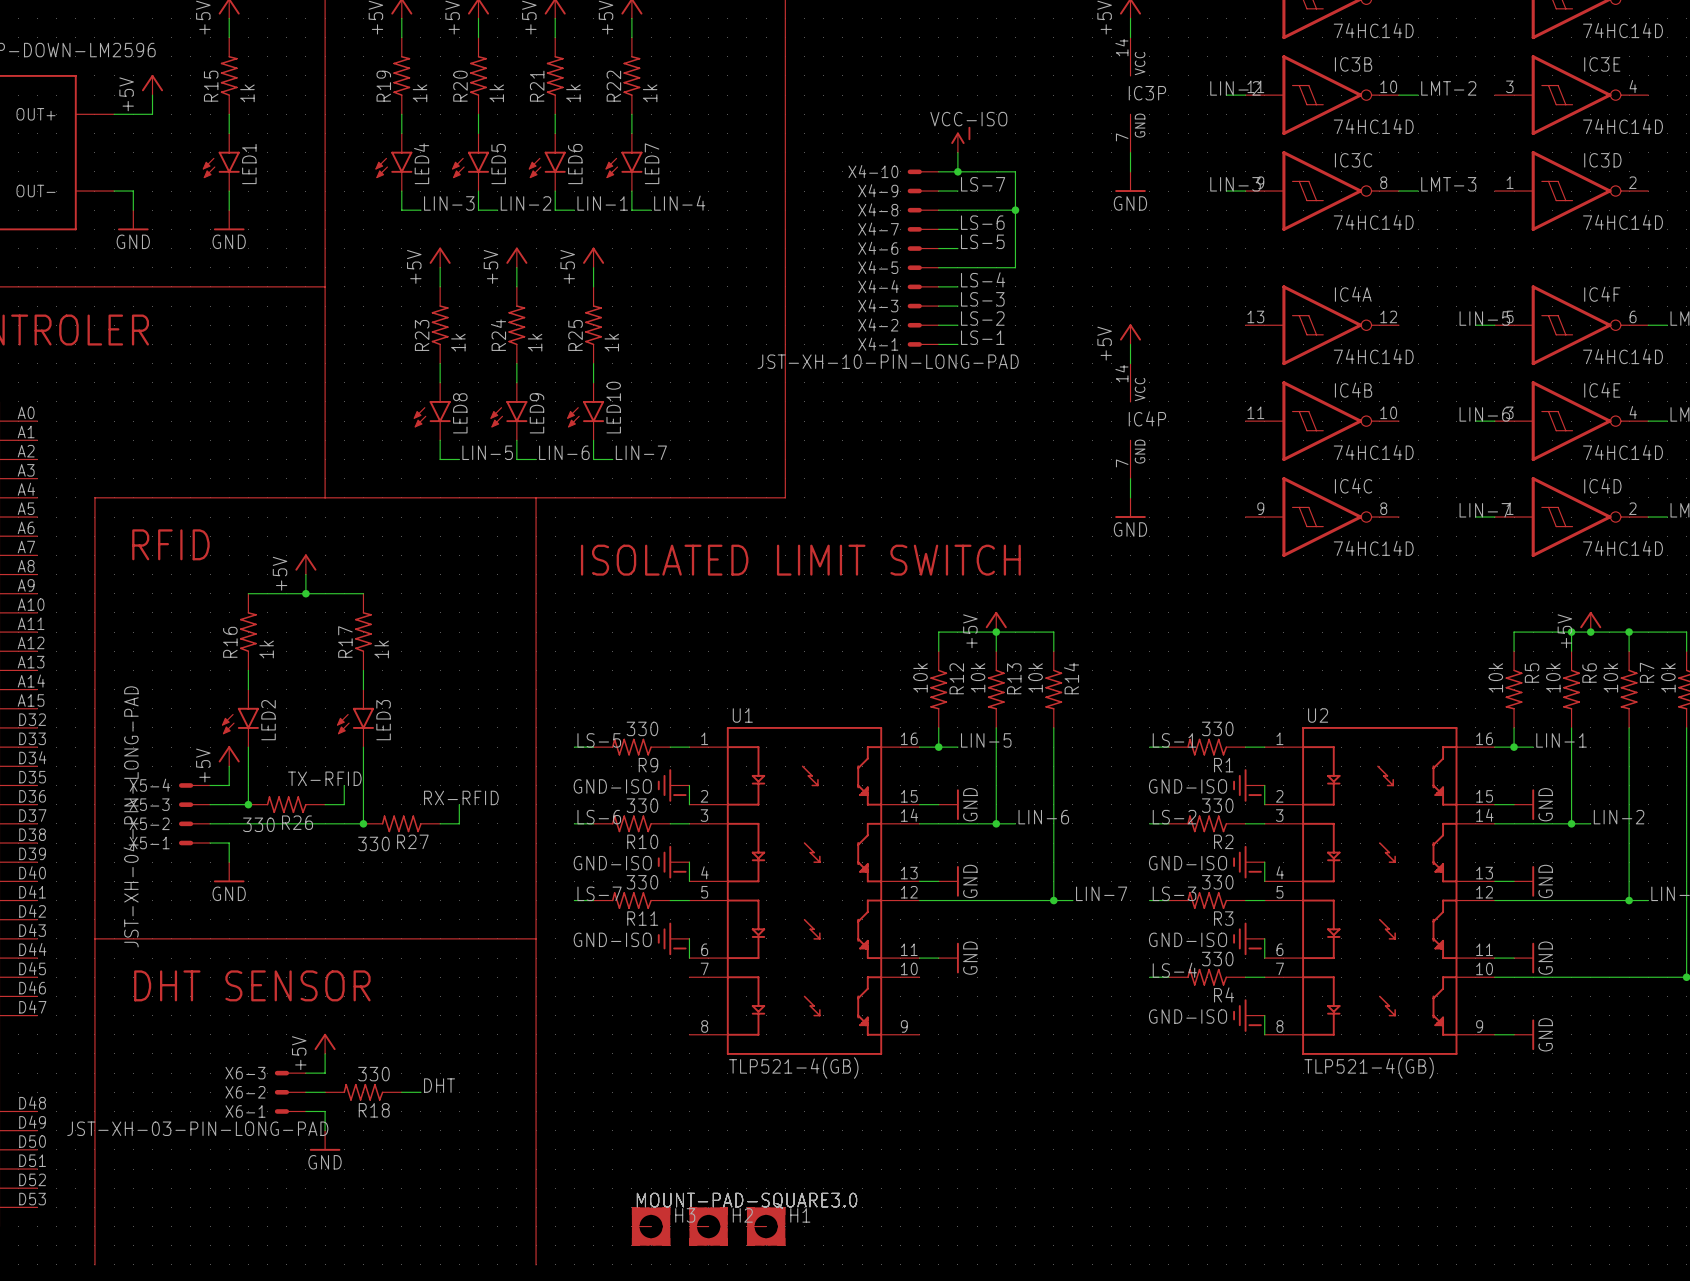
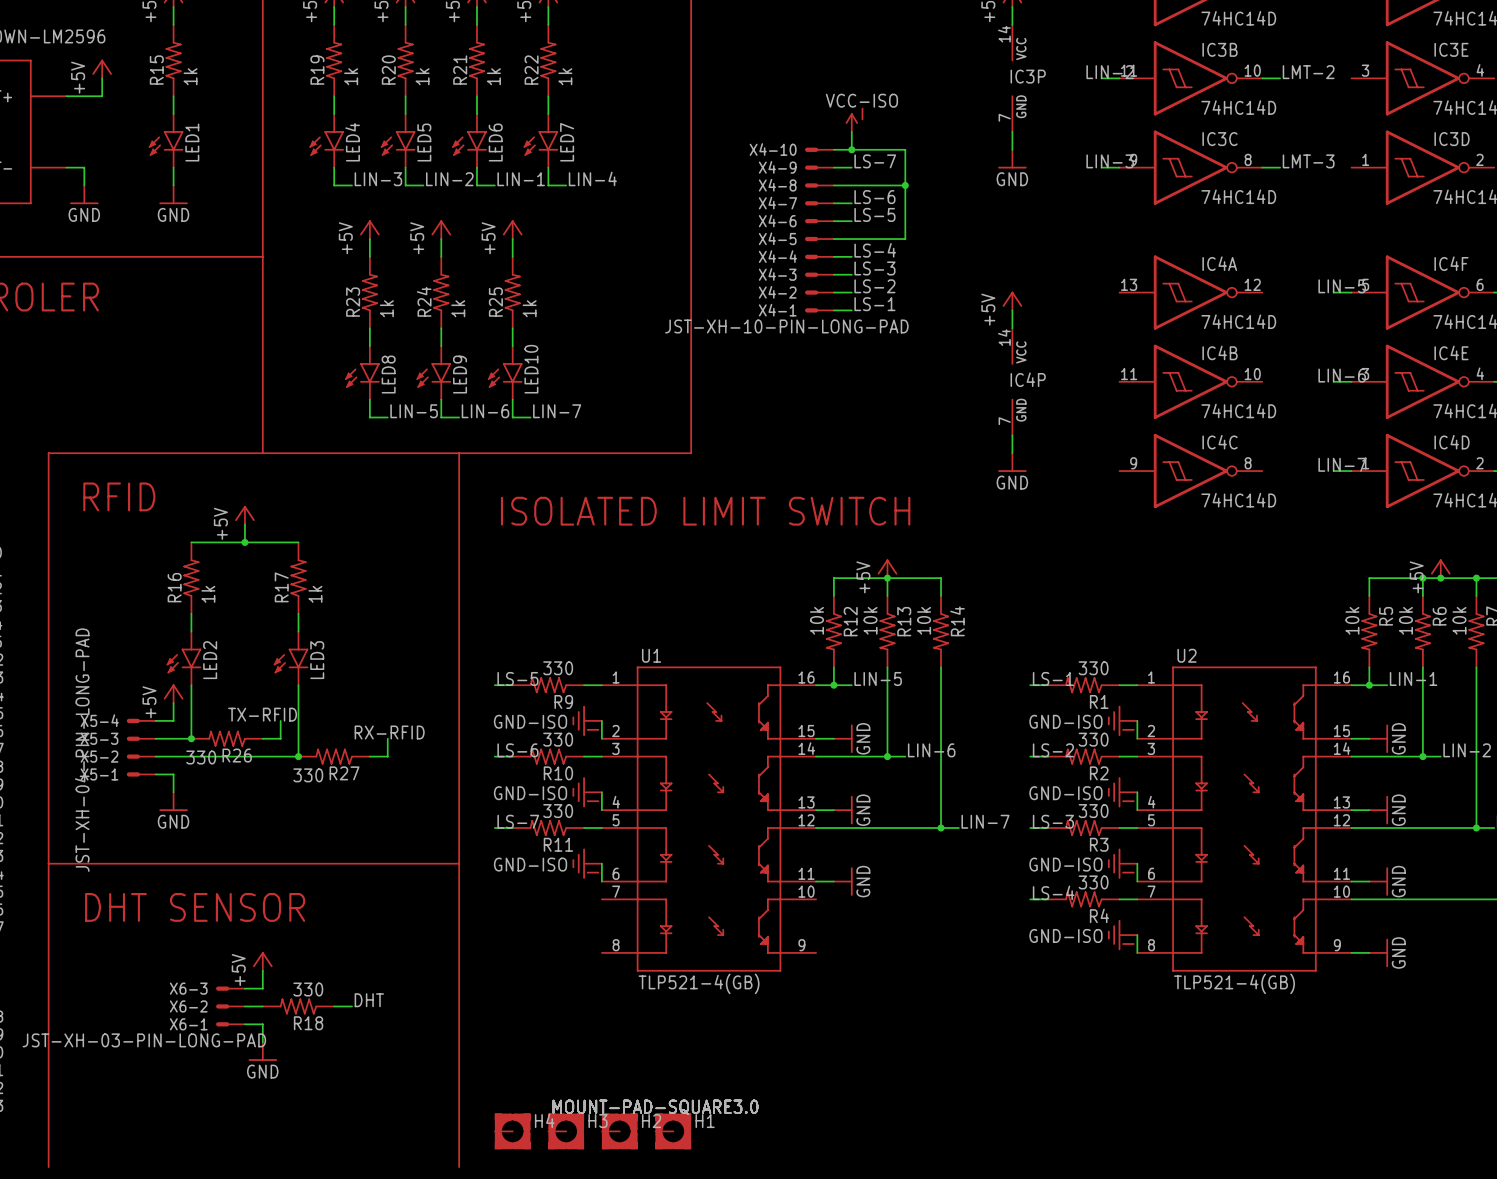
H4: none -> MOUNT-PAD-SQUARE3.0 (512, 1131)

